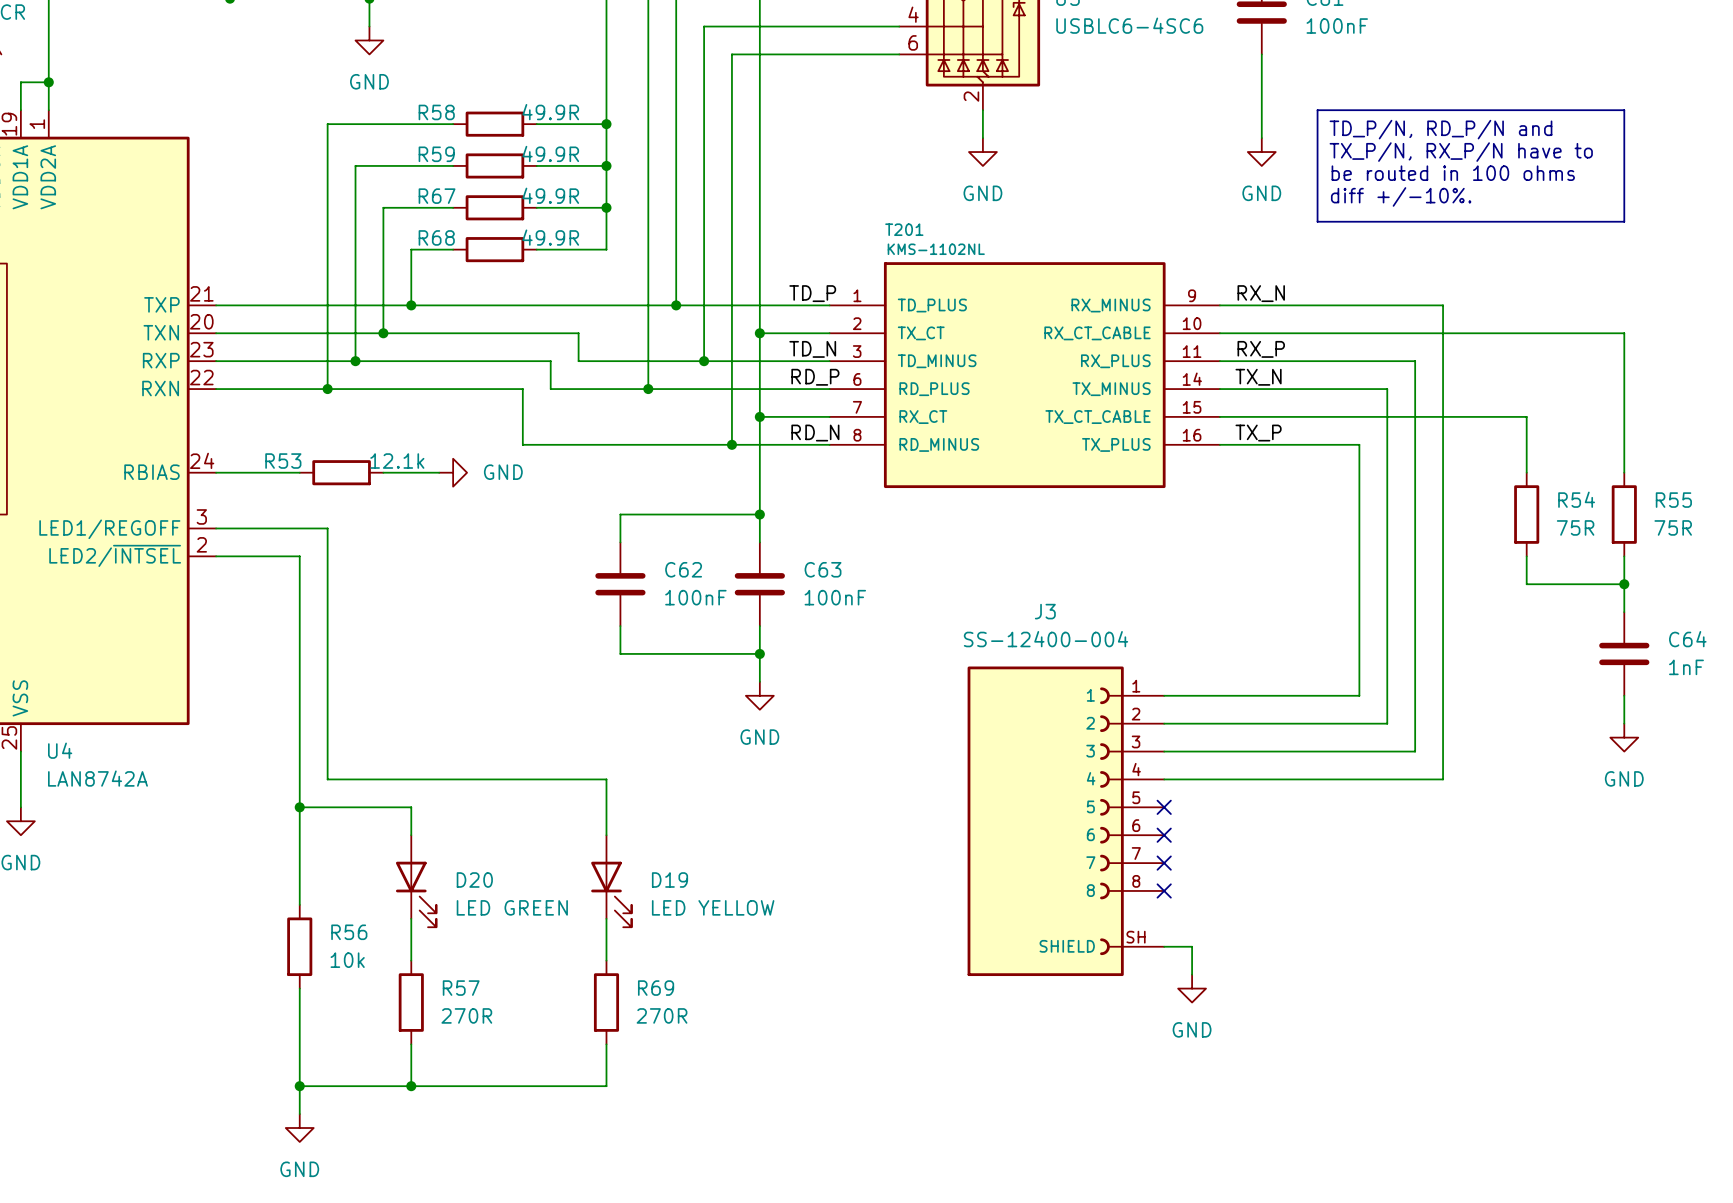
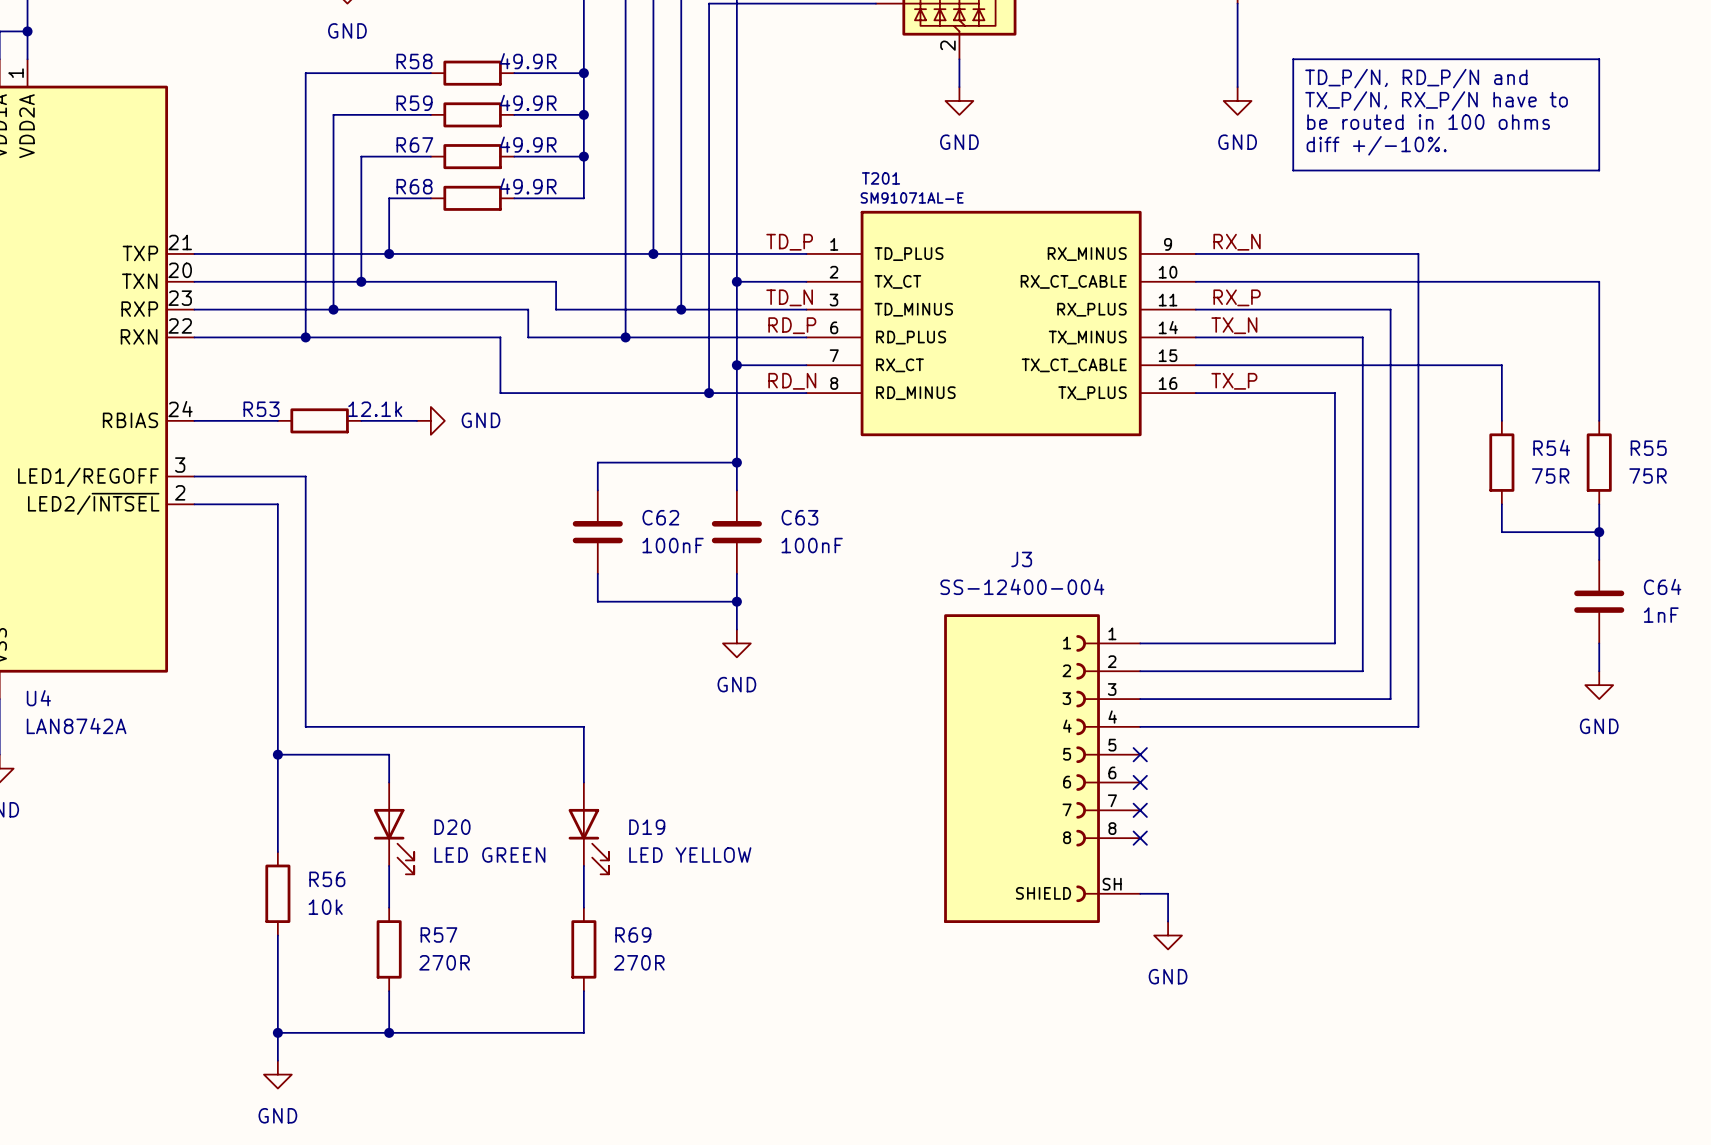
T201 value: KMS-1102NL (936, 249) -> SM91071AL-E (912, 197)

